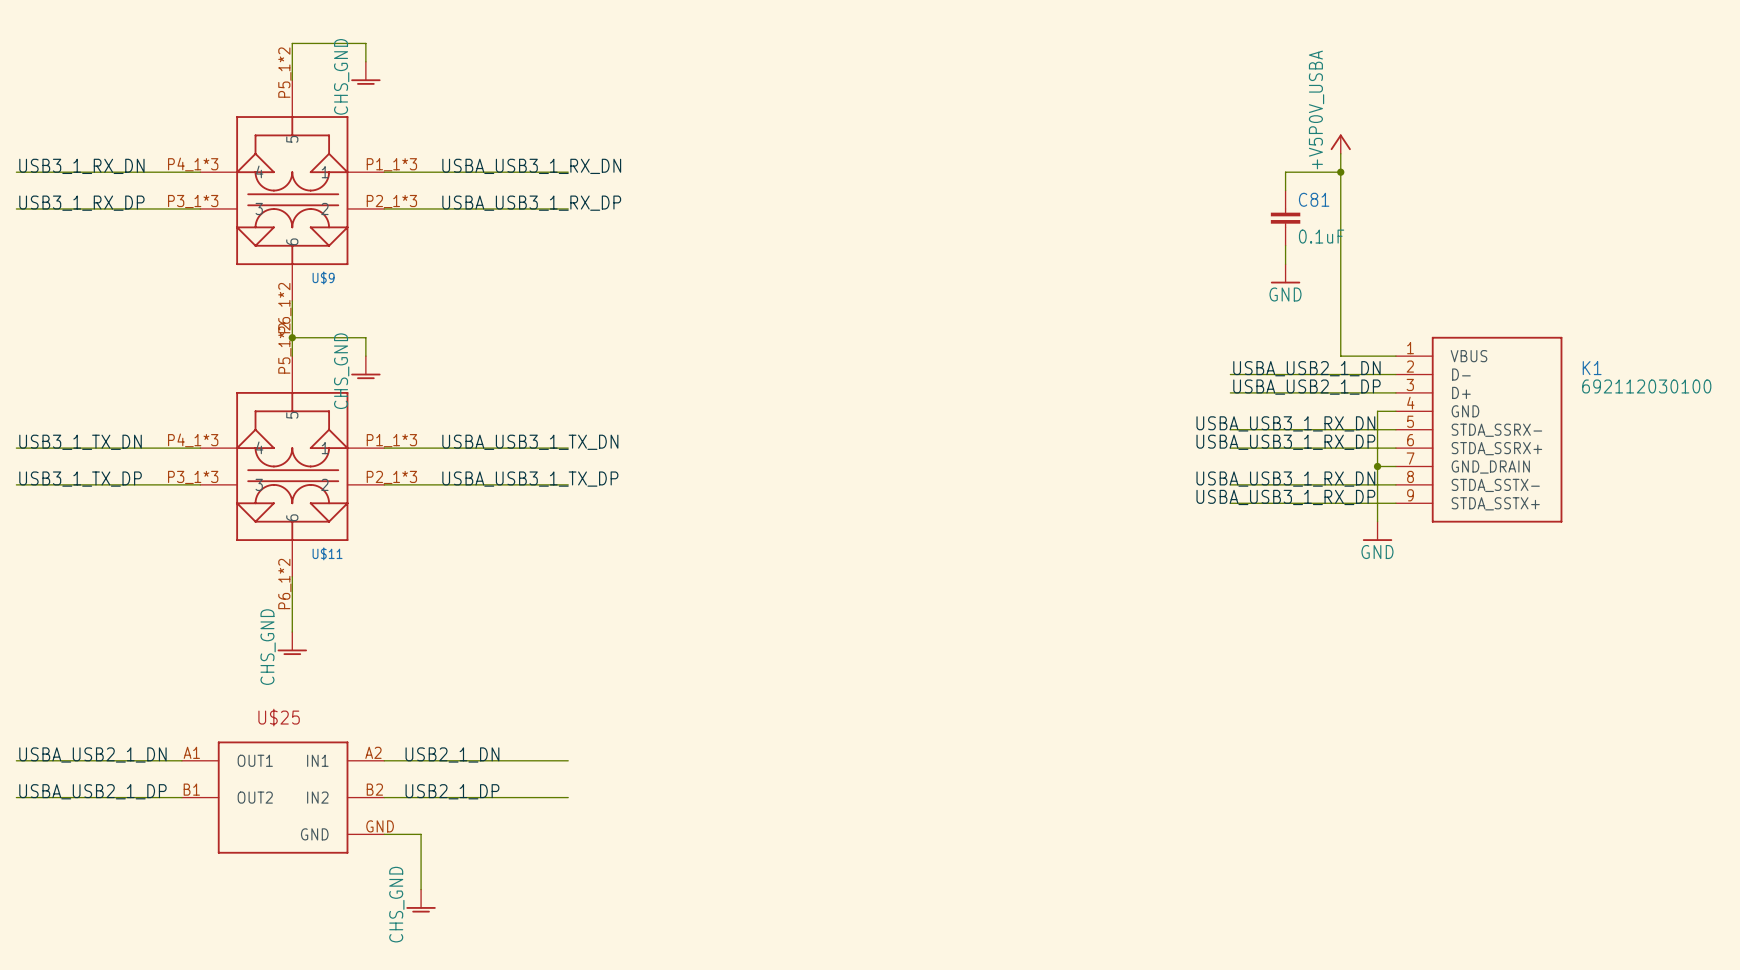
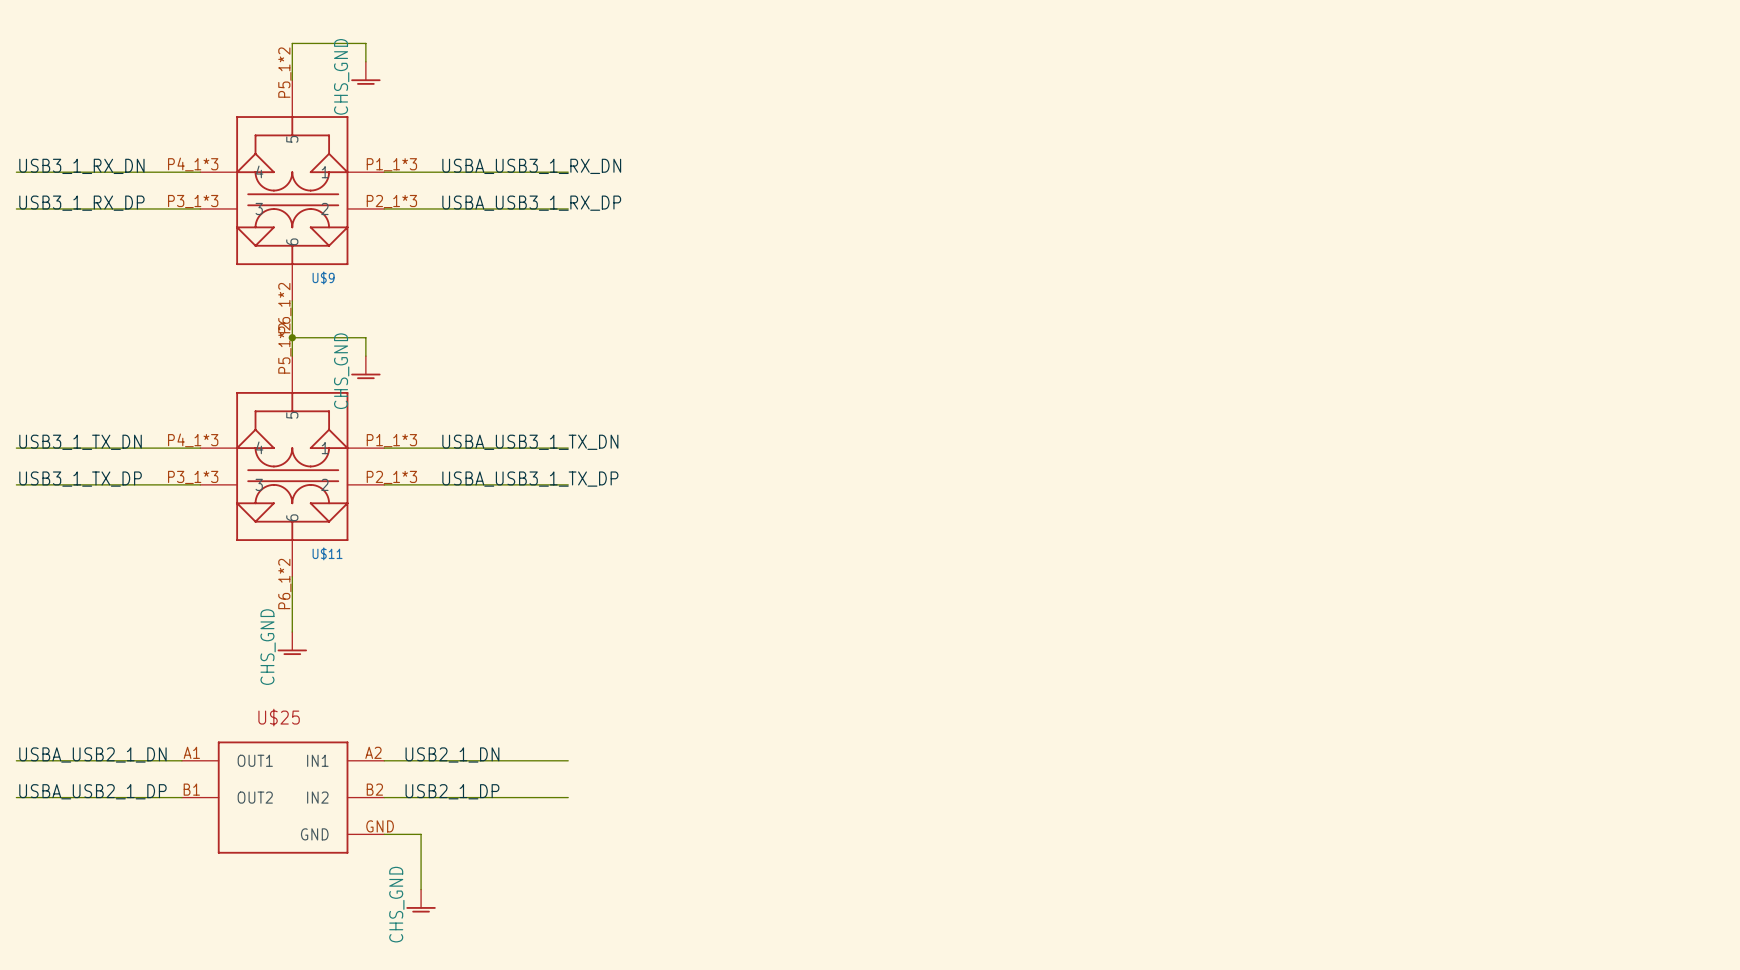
power symbol: +V5P0V_USBA (1340, 144) -> none
wire: (1340, 153) (1340, 356) (1395, 356) -> none
wire: (1340, 172) (1285, 172) (1285, 190) -> none
junction: (1340, 172) -> none
C81: 0.1uF (1285, 218) -> none
wire: (1285, 245) (1285, 264) -> none
power symbol: GND (1285, 273) -> none
label: USBA_USB2_1_DN (1306, 368) -> none
wire: (1230, 374) (1395, 374) -> none
label: USBA_USB2_1_DP (1306, 387) -> none
wire: (1230, 392) (1395, 392) -> none
wire: (1395, 411) (1377, 411) (1377, 521) -> none
label: USBA_USB3_1_RX_DN (1285, 423) -> none
wire: (1230, 429) (1395, 429) -> none
K1: 692112030100 (1479, 429) -> none
label: USBA_USB3_1_RX_DP (1285, 442) -> none
wire: (1230, 448) (1395, 448) -> none
wire: (1377, 466) (1395, 466) -> none
junction: (1377, 466) -> none
label: USBA_USB3_1_RX_DN (1285, 479) -> none
wire: (1230, 484) (1395, 484) -> none
label: USBA_USB3_1_RX_DP (1285, 497) -> none
wire: (1230, 503) (1395, 503) -> none
power symbol: GND (1377, 531) -> none

